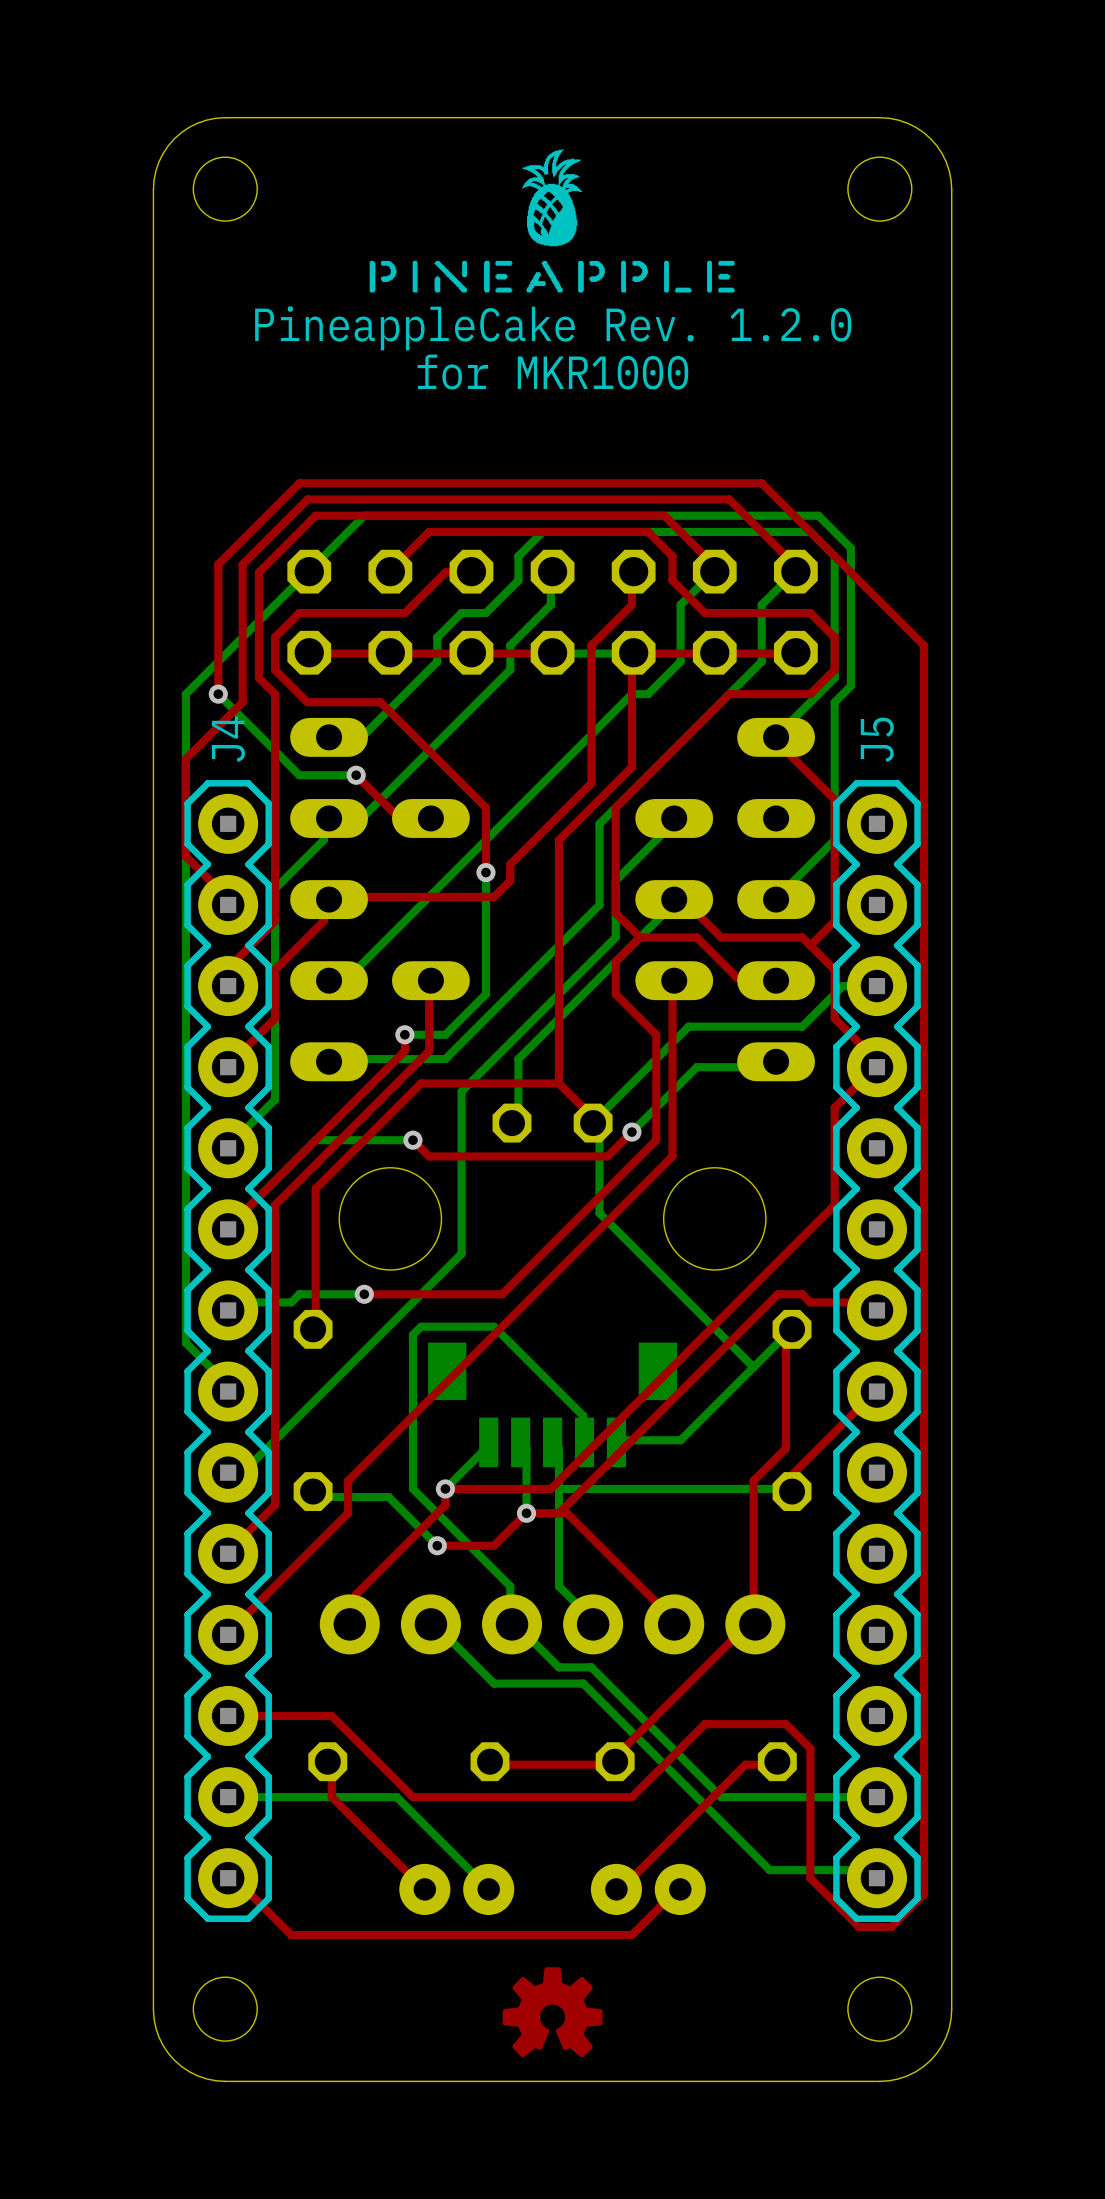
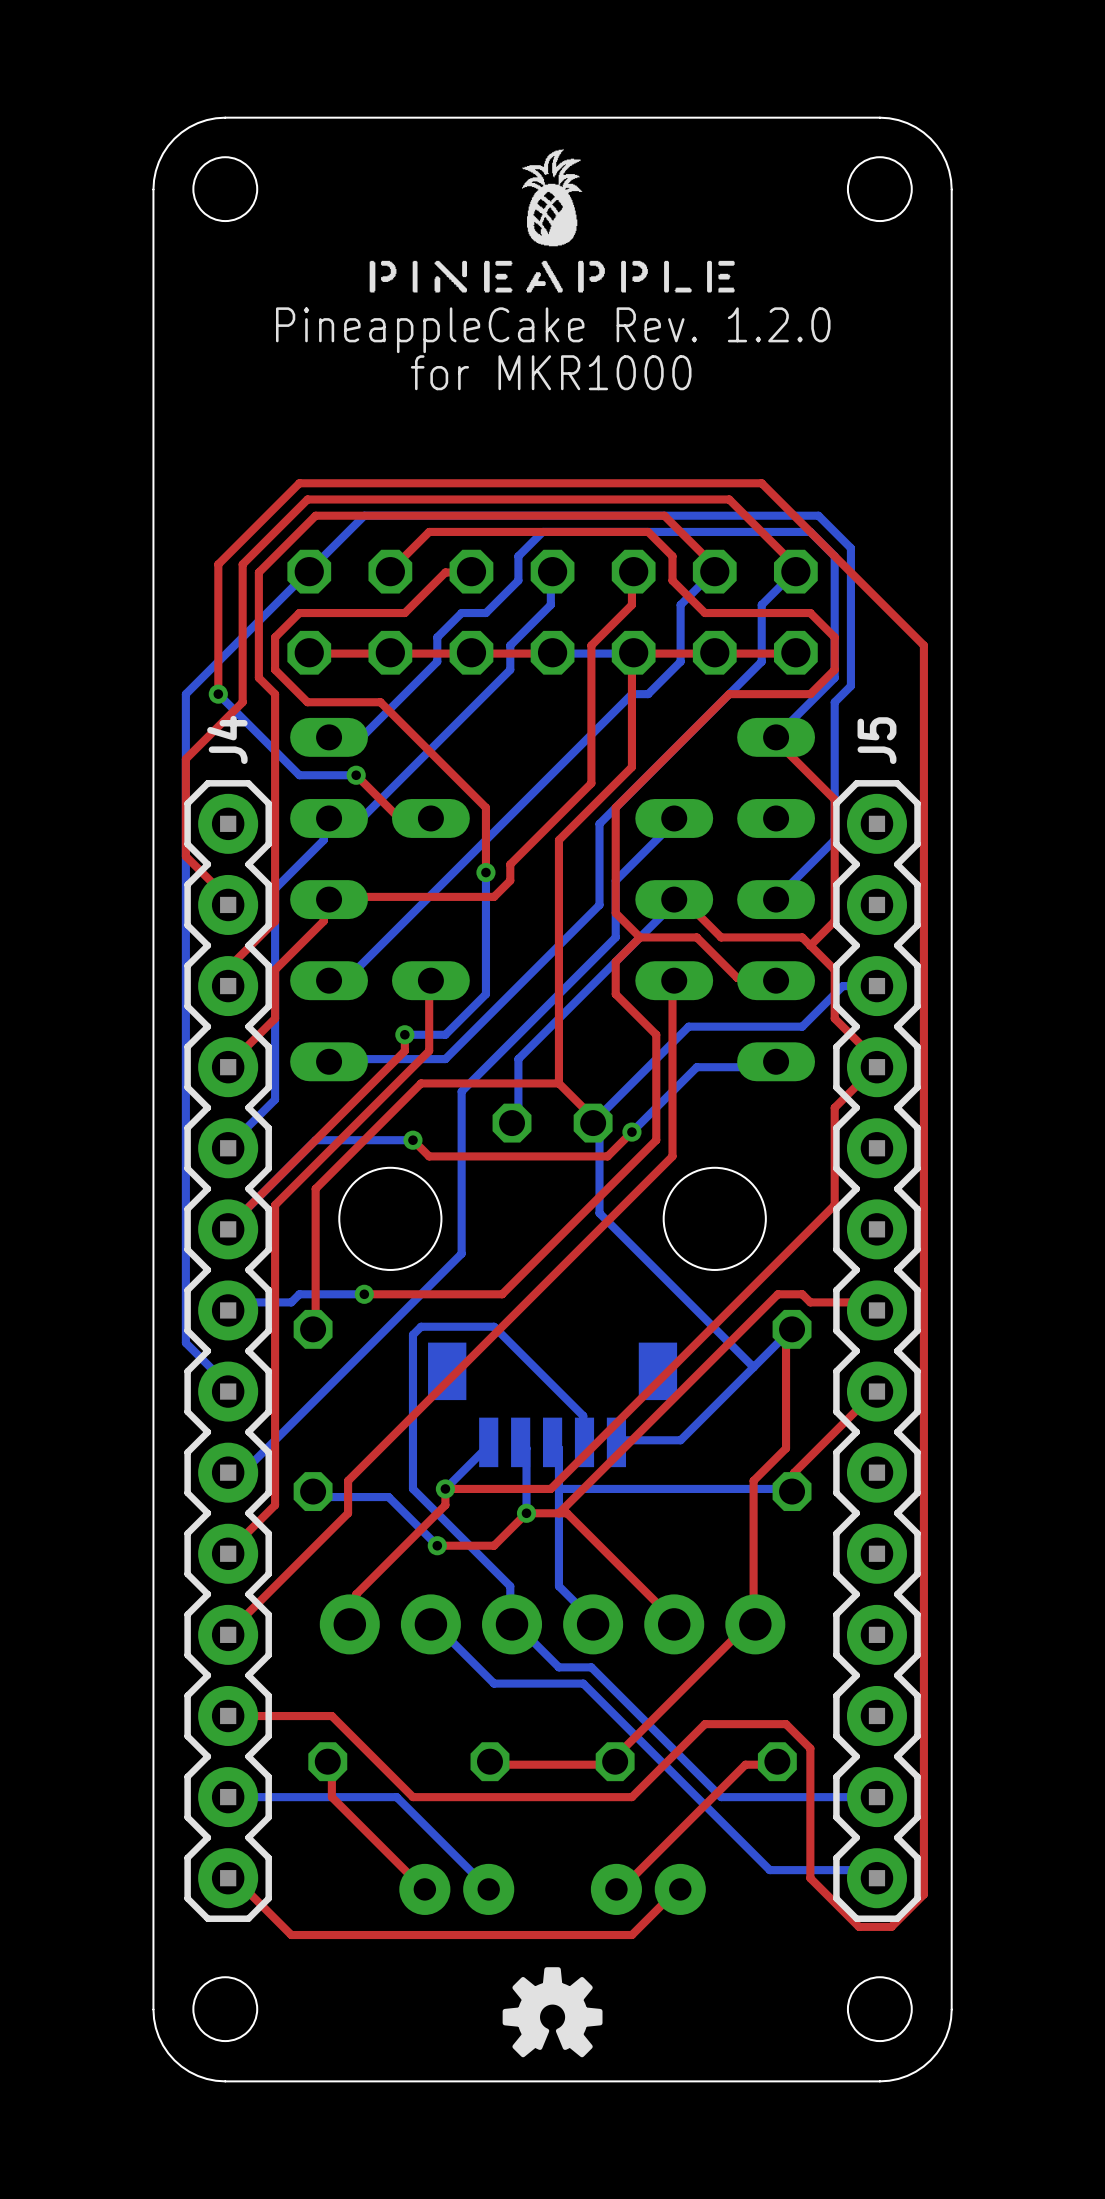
drawing shape: [502, 1967, 603, 2058] -> [502, 1967, 603, 2058]

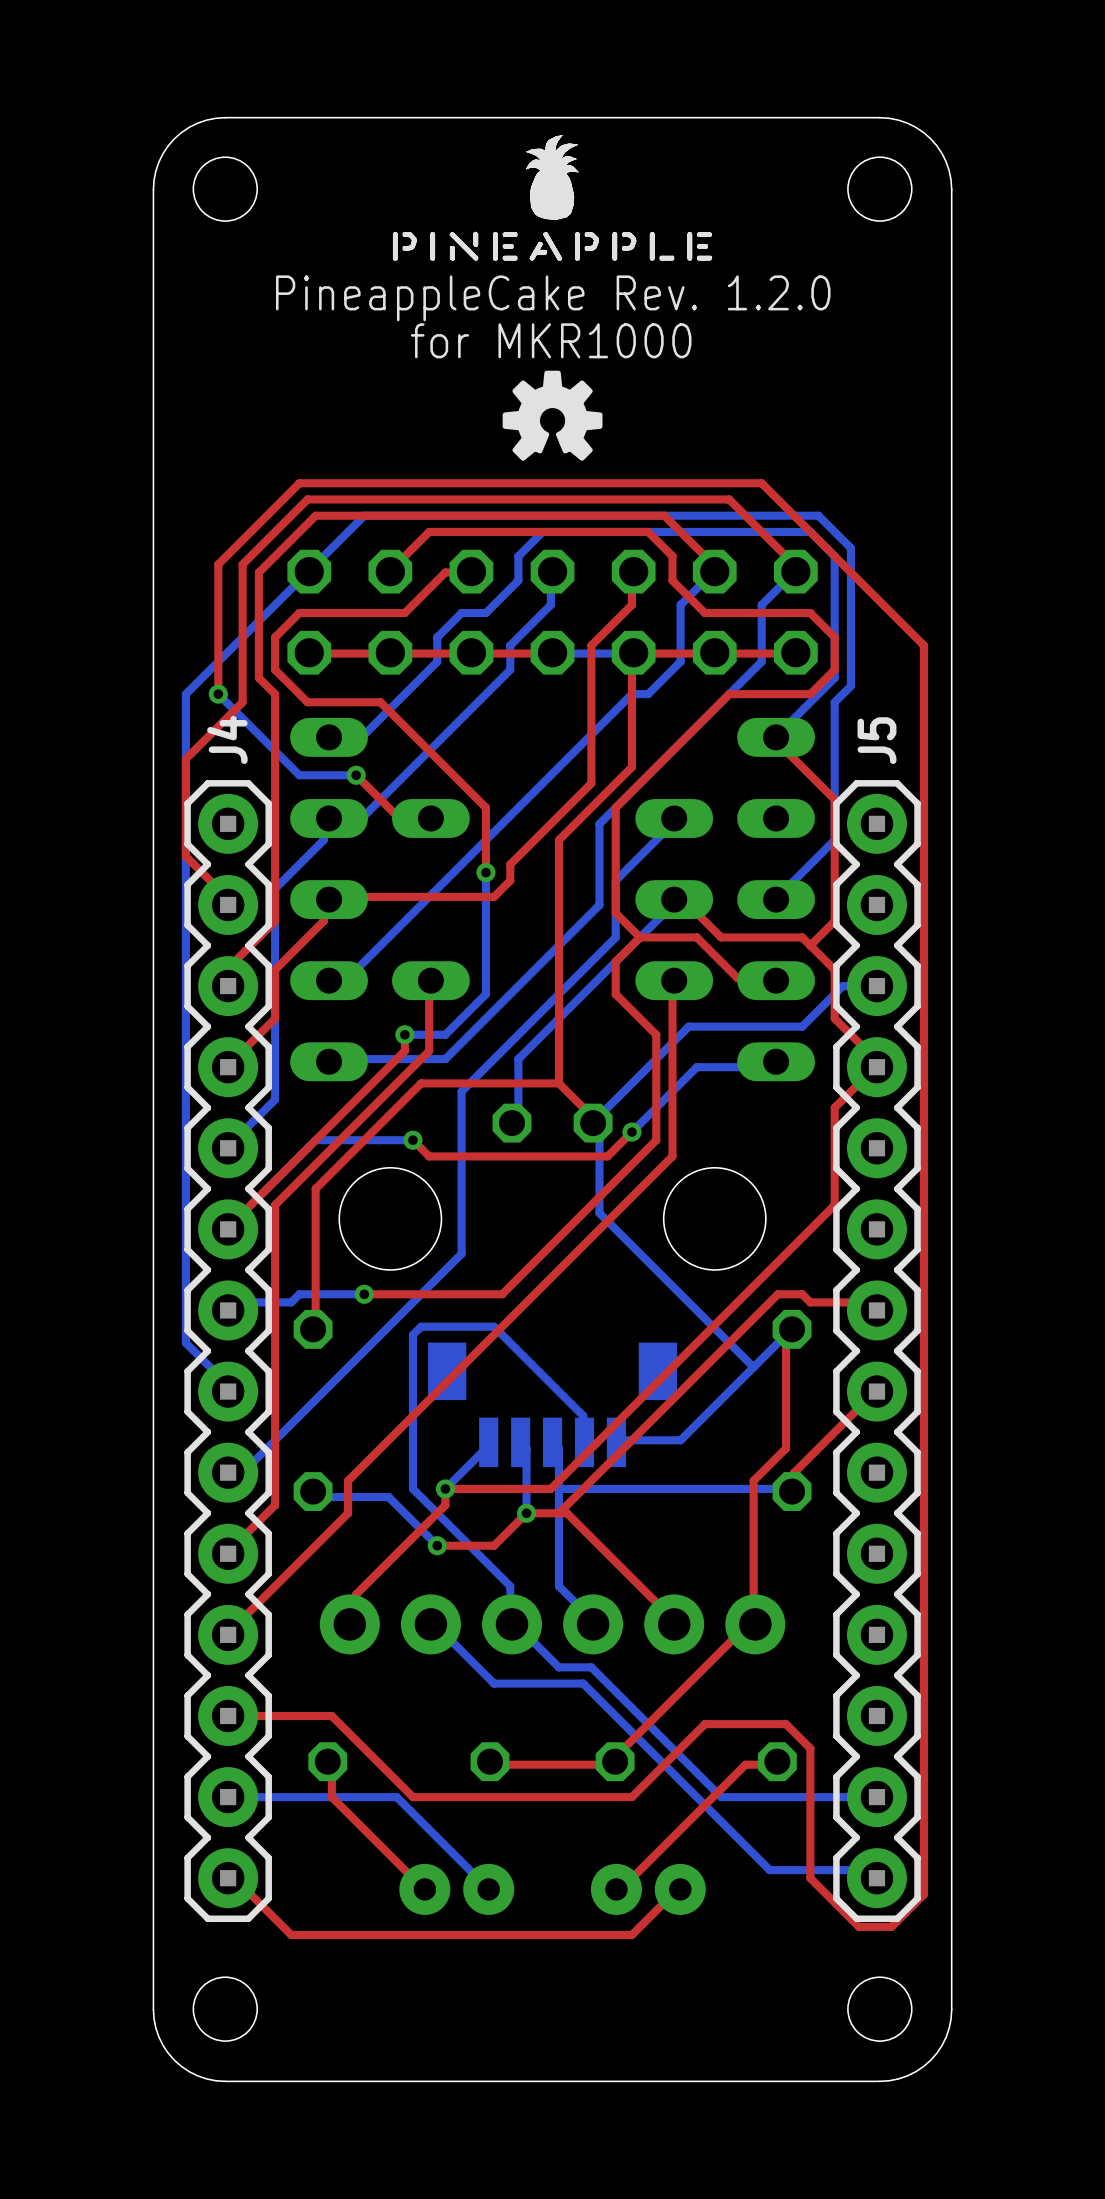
drawing shape: [369, 148, 735, 293] -> [392, 134, 713, 261]
text position: PineappleCake Rev. 1.2.0 (553, 330) -> PineappleCake Rev. 1.2.0 (553, 298)
drawing: none -> [502, 370, 603, 461]
text position: for MKR1000 (551, 372) -> for MKR1000 (551, 340)
drawing: [502, 1967, 603, 2058] -> none

